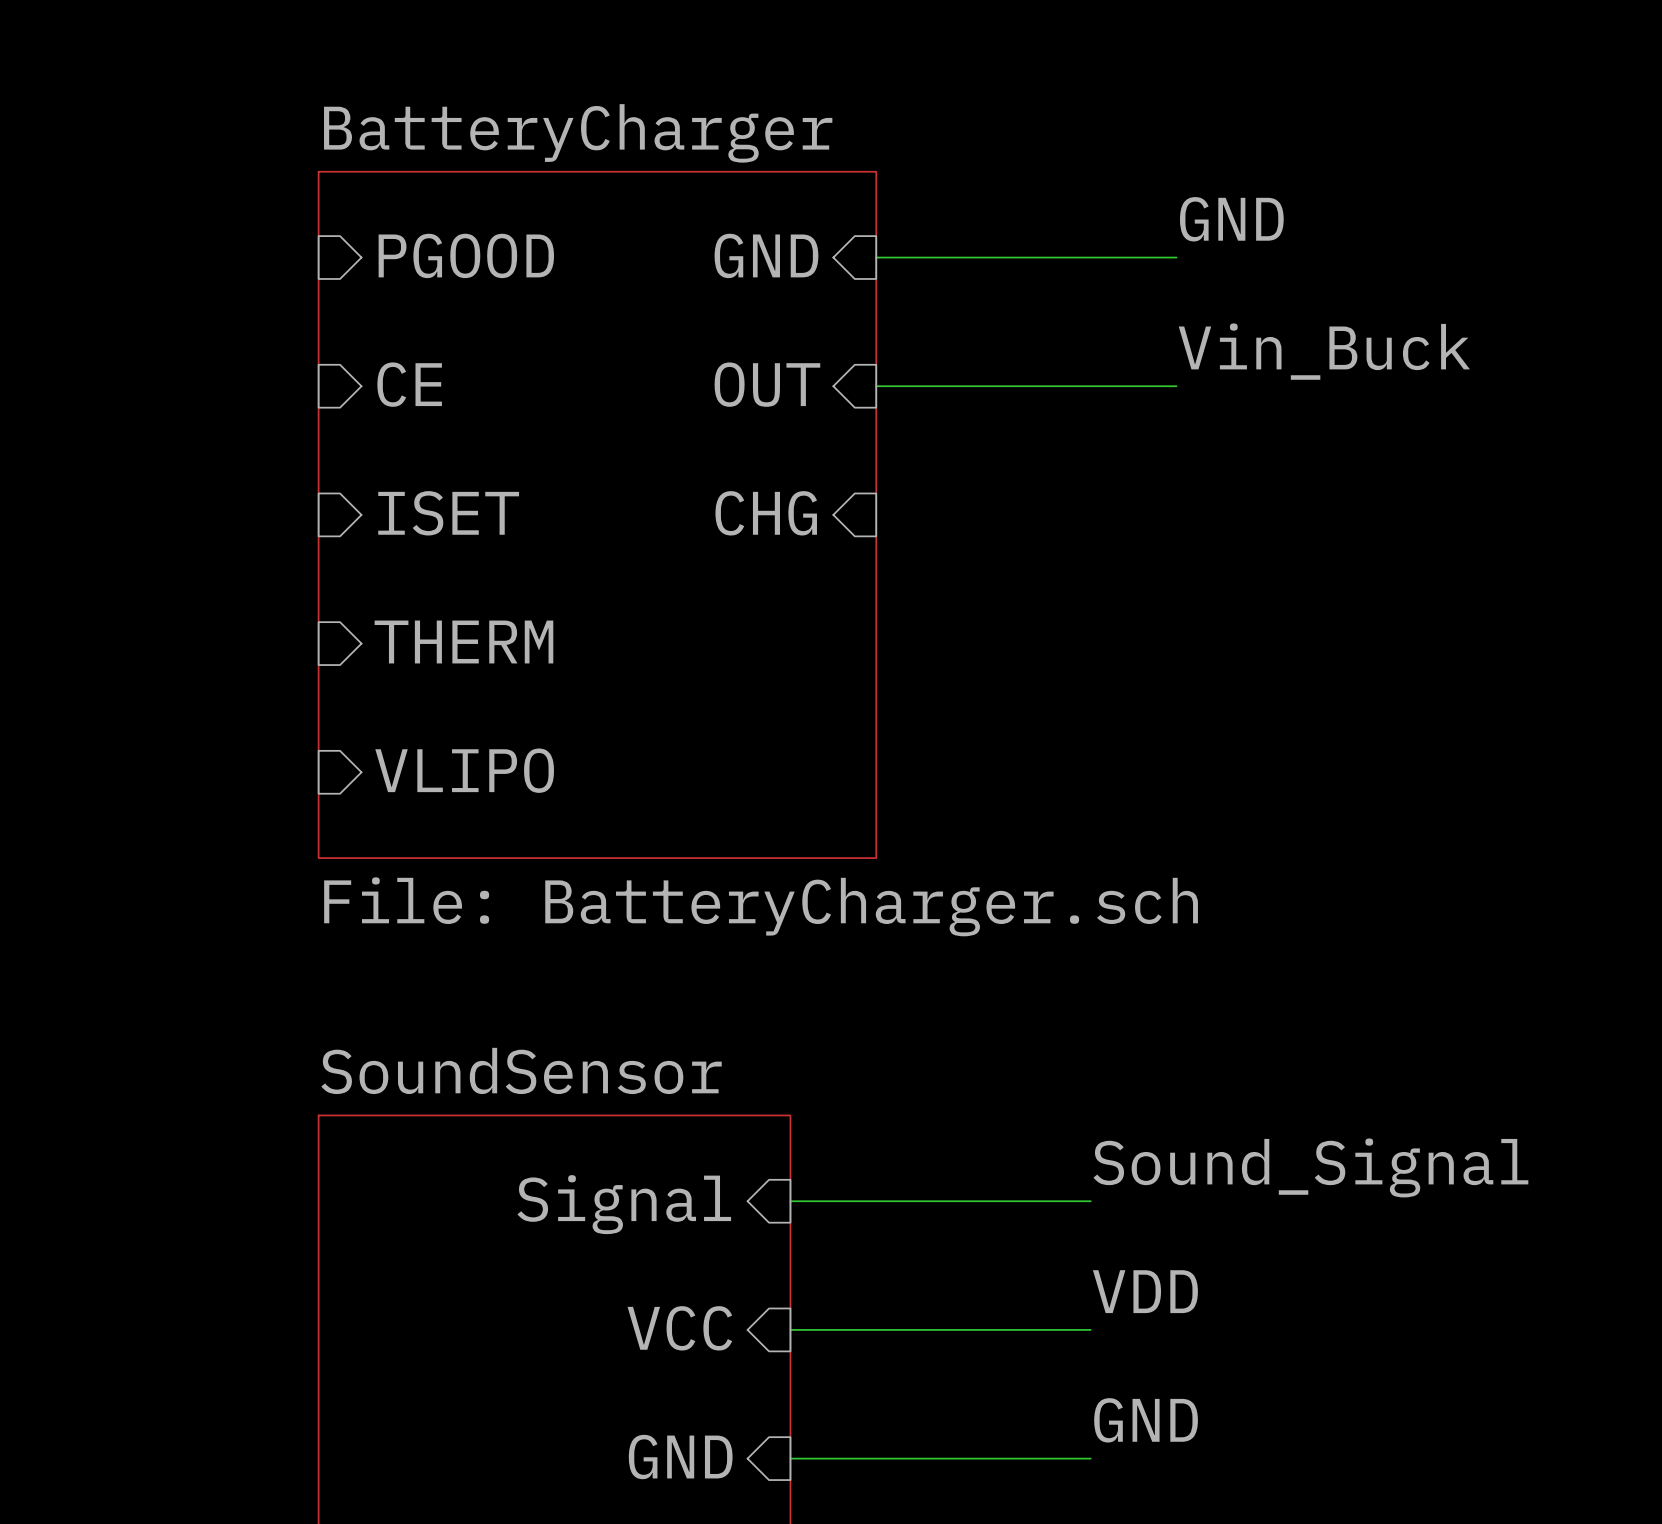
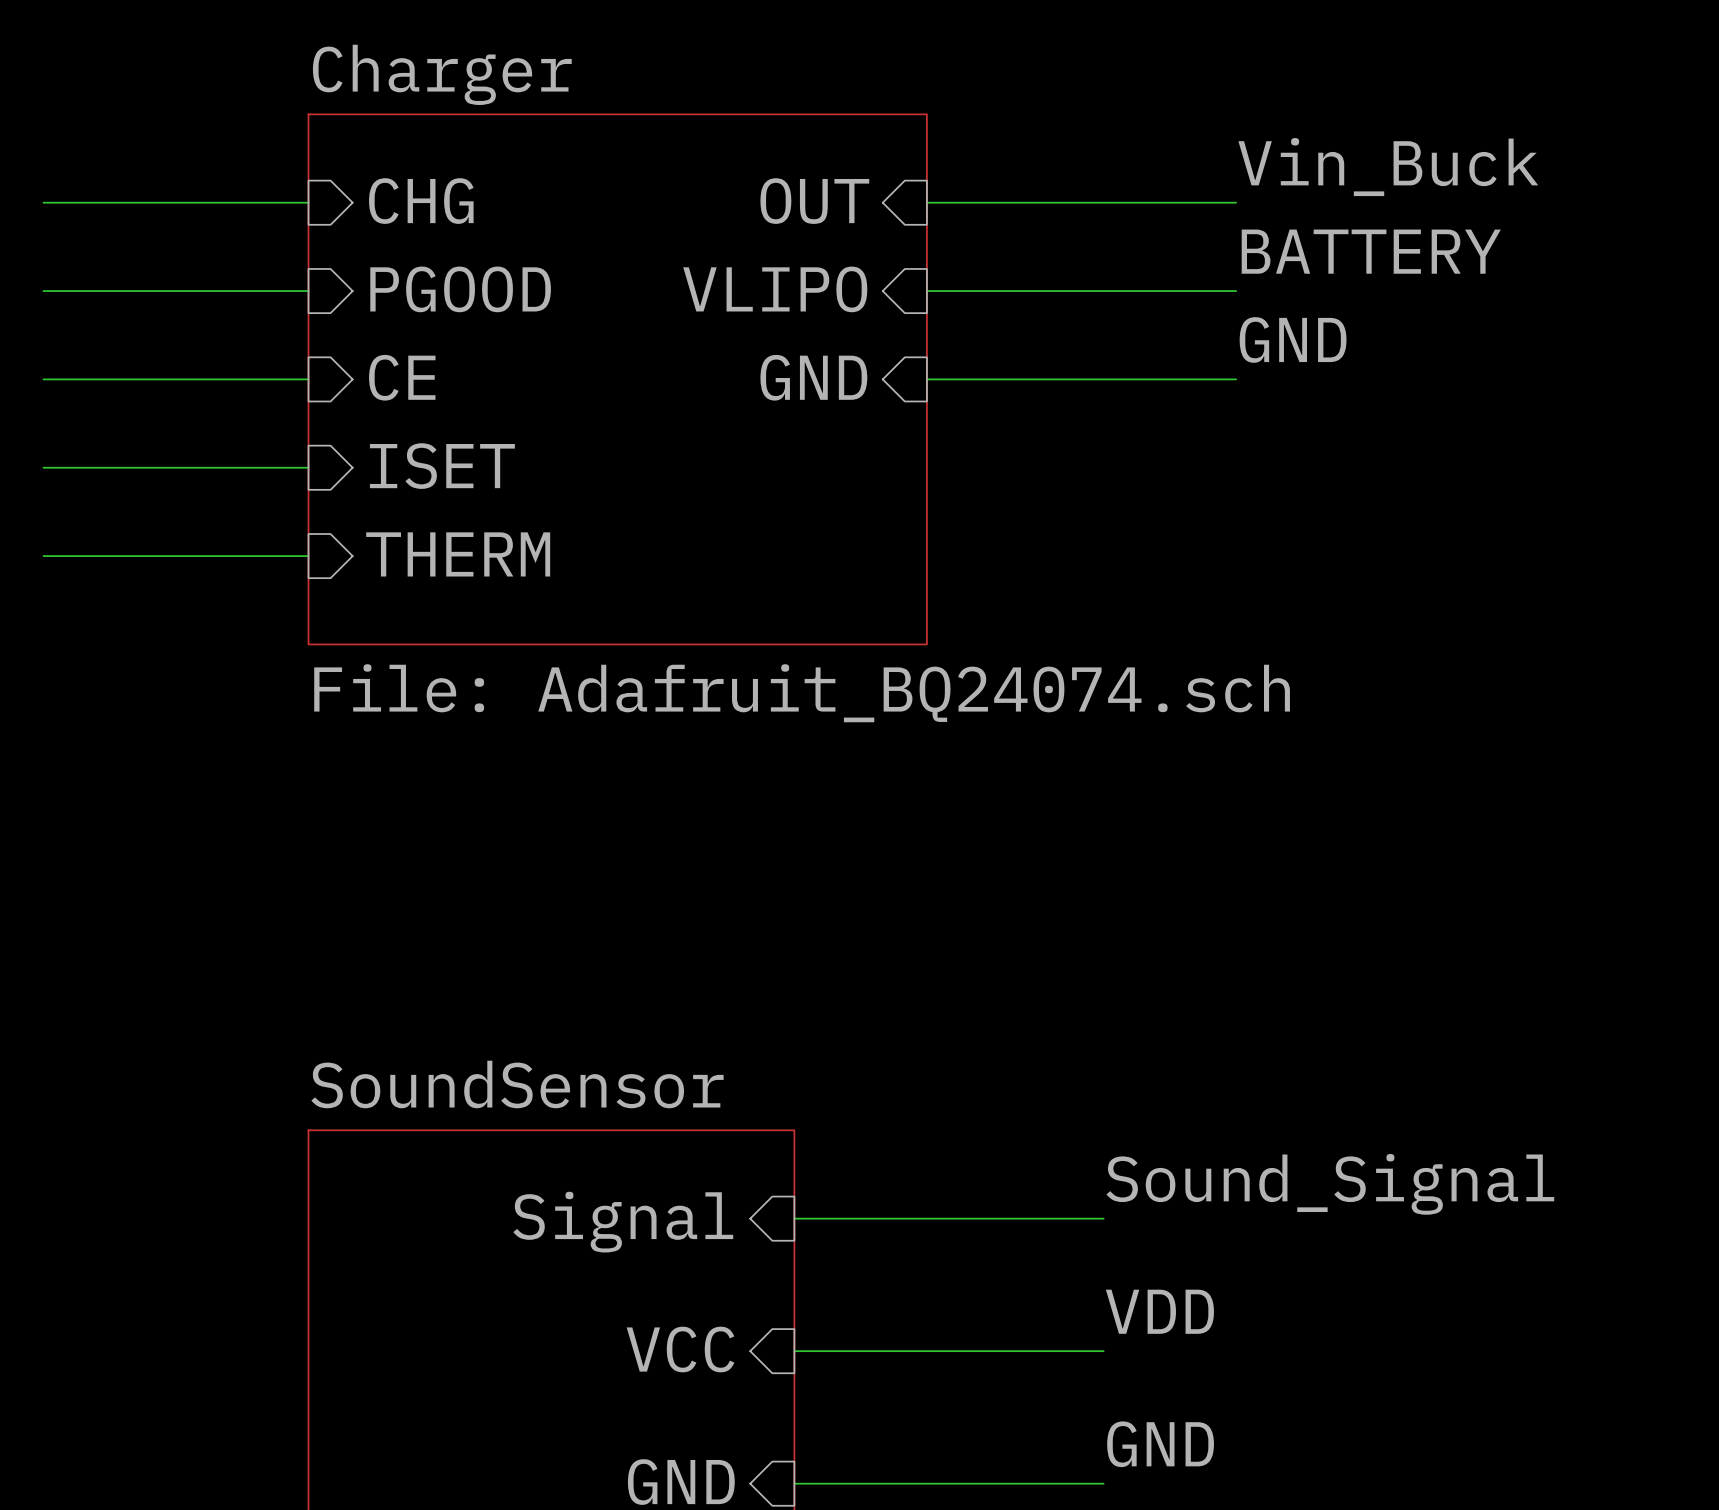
wire: none -> (43, 202) (308, 202)
label position: GND (1231, 219) -> GND (1293, 339)
sheet pin position: PGOOD (466, 255) -> PGOOD (460, 289)
sheet pin position: GND (766, 255) -> GND (813, 377)
wire: (876, 257) (1176, 257) -> (926, 202) (1236, 202)
label: none -> BATTERY (1371, 251)
wire: none -> (43, 291) (308, 291)
wire: none -> (926, 291) (1236, 291)
label position: Vin_Buck (1324, 351) -> Vin_Buck (1388, 167)
sheet pin position: OUT (767, 384) -> OUT (814, 201)
wire: none -> (43, 379) (308, 379)
sheet Charger: none -> File: Adafruit_BQ24074.sch (617, 379)
wire: (876, 386) (919, 386) -> (1191, 379) (1236, 379)
wire: none -> (43, 467) (308, 467)
sheet pin position: ISET (448, 513) -> ISET (442, 466)
sheet pin rotation: 0° (766, 513) -> 180° (421, 201)
sheet pin position: CHG (766, 513) -> CHG (421, 201)
sheet BatteryCharger: File: BatteryCharger.sch (597, 514) -> none
wire: none -> (43, 556) (308, 556)
sheet pin position: THERM (463, 641) -> THERM (458, 554)
sheet pin rotation: 0° (464, 770) -> 180° (775, 289)
sheet pin position: VLIPO (464, 770) -> VLIPO (775, 289)

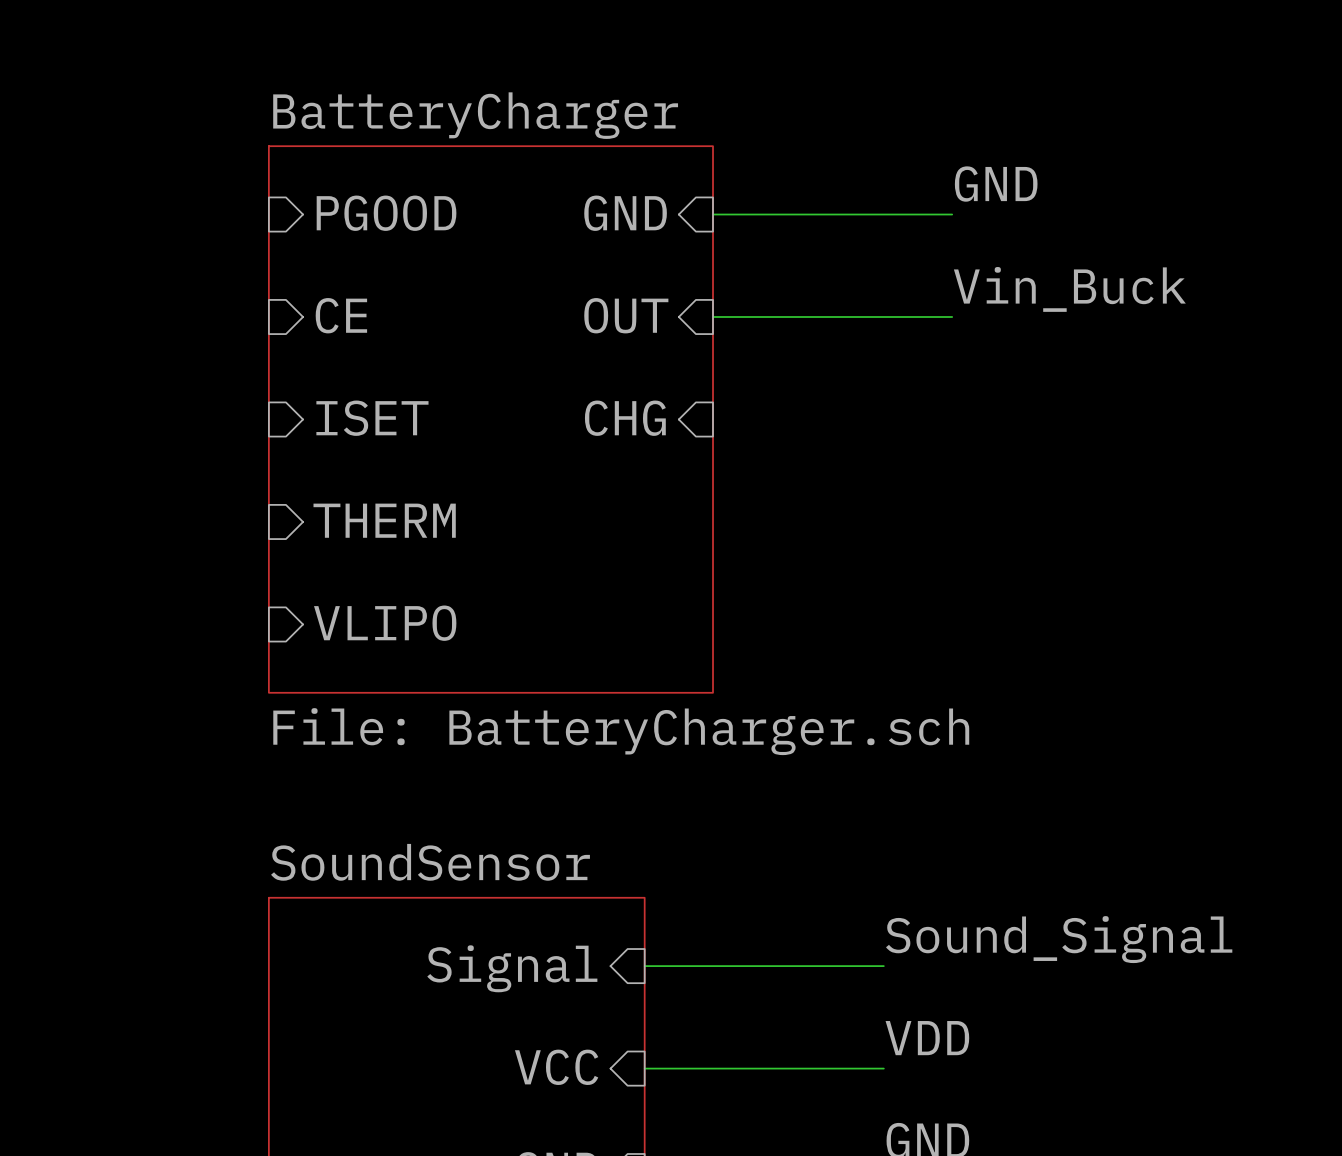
label position: Vin_Buck (1388, 167) -> Vin_Buck (1069, 289)
sheet pin rotation: 0° (421, 201) -> 180° (625, 418)
sheet pin position: CHG (421, 201) -> CHG (625, 418)
sheet pin position: OUT (814, 201) -> OUT (626, 315)
wire: (43, 202) (308, 202) -> none
wire: (926, 202) (1236, 202) -> (713, 214) (952, 214)
label: BATTERY (1371, 251) -> none
sheet pin position: PGOOD (460, 289) -> PGOOD (386, 213)
sheet pin rotation: 0° (775, 289) -> 180° (385, 623)
sheet pin position: VLIPO (775, 289) -> VLIPO (385, 623)
wire: (43, 291) (308, 291) -> none
wire: (926, 291) (1236, 291) -> none
label position: GND (1293, 339) -> GND (996, 184)
sheet pin position: GND (813, 377) -> GND (625, 213)
wire: (43, 379) (308, 379) -> none
sheet Charger: File: Adafruit_BQ24074.sch (617, 379) -> none
wire: (1191, 379) (1236, 379) -> (713, 317) (747, 317)
sheet pin position: ISET (442, 466) -> ISET (372, 418)
wire: (43, 467) (308, 467) -> none
sheet BatteryCharger: none -> File: BatteryCharger.sch (490, 419)
sheet pin position: THERM (458, 554) -> THERM (384, 520)
wire: (43, 556) (308, 556) -> none

